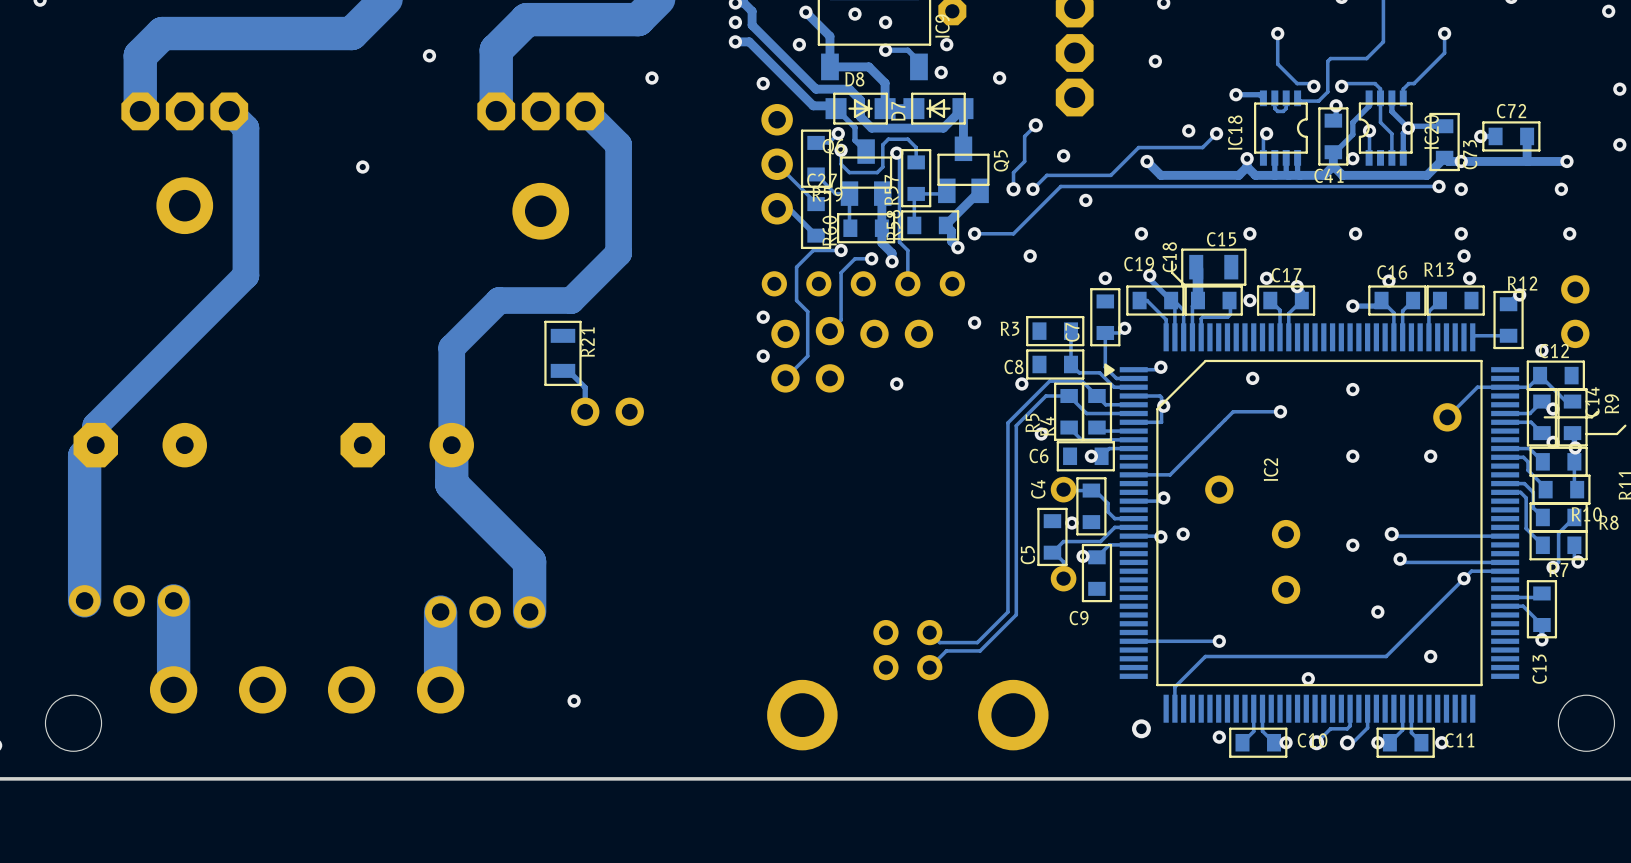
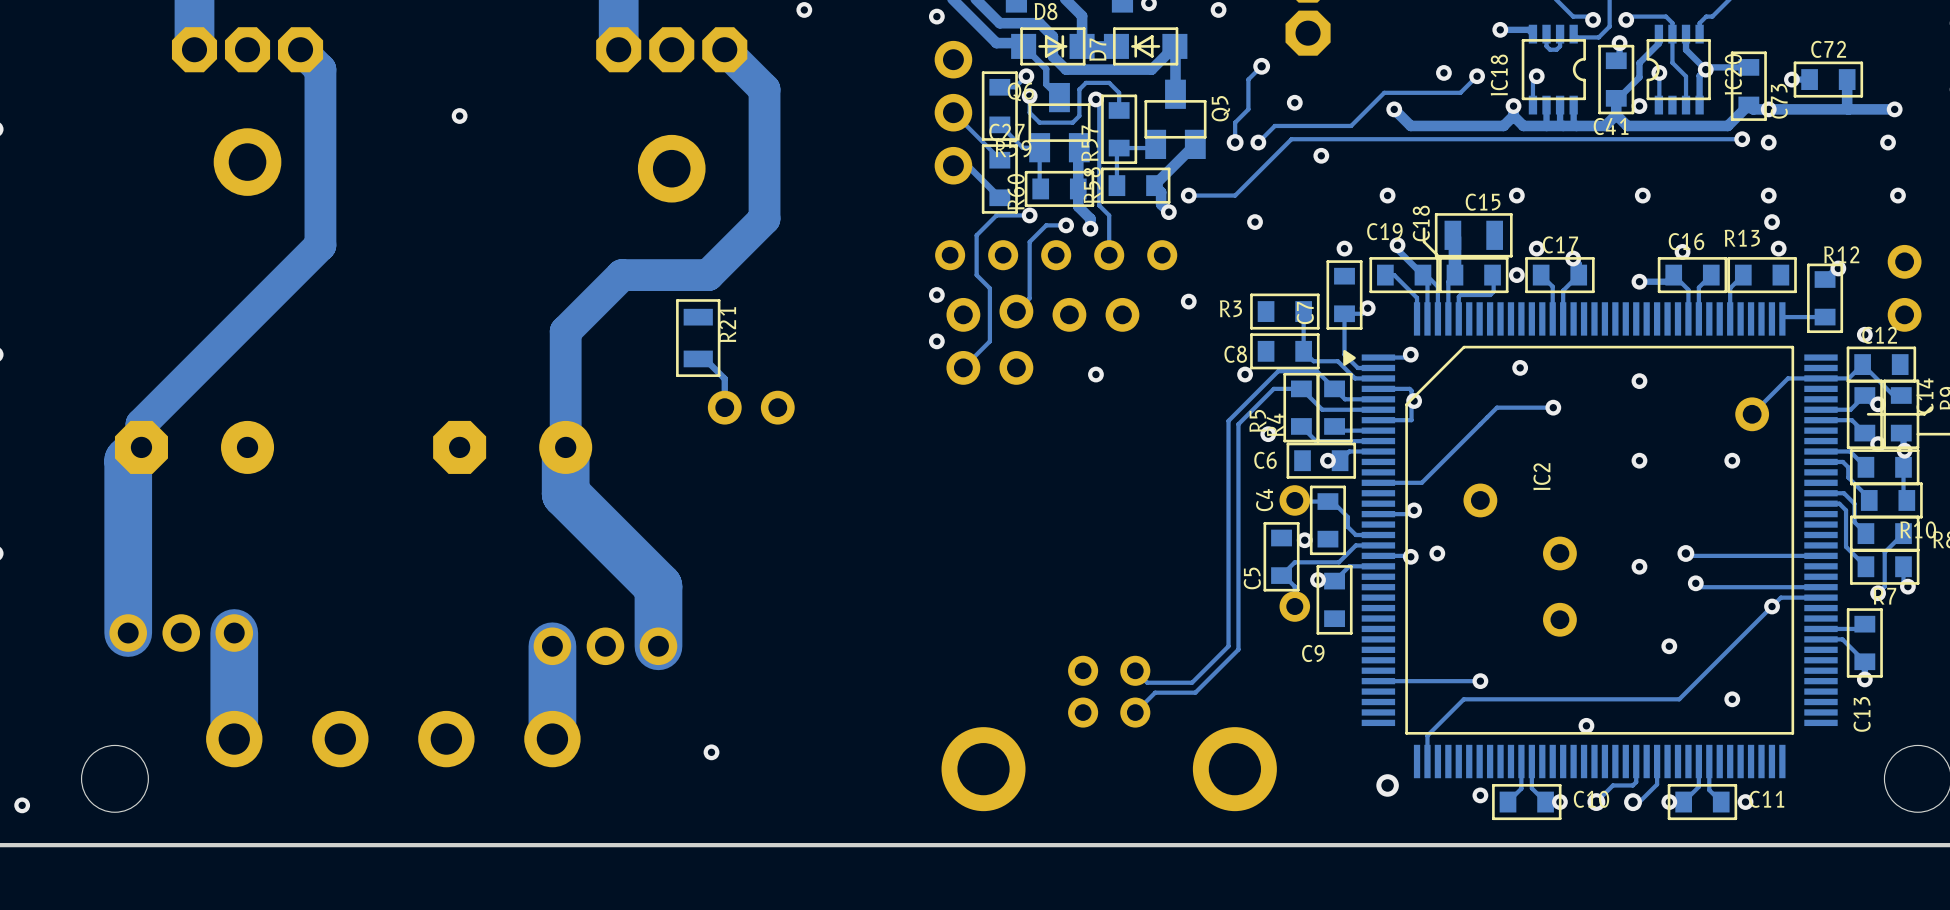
track width: thin (95, 445) (84, 456) (84, 600) -> thick (141, 447) (128, 460) (128, 633)
track width: thin (451, 445) (451, 484) (529, 561) (529, 612) -> thick (565, 447) (565, 493) (658, 586) (658, 646)
track width: thin (173, 600) (173, 689) -> thick (234, 633) (234, 739)
track width: thin (440, 612) (440, 689) -> thick (552, 646) (552, 739)

